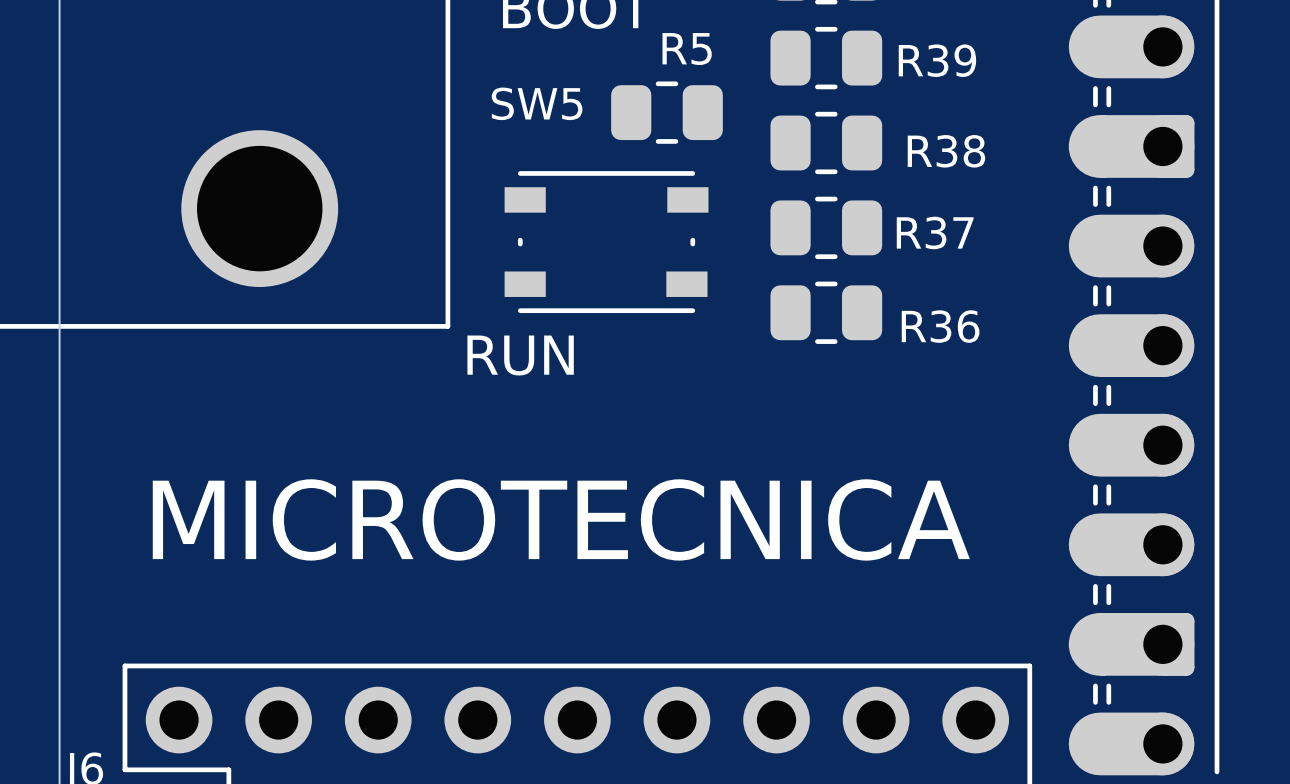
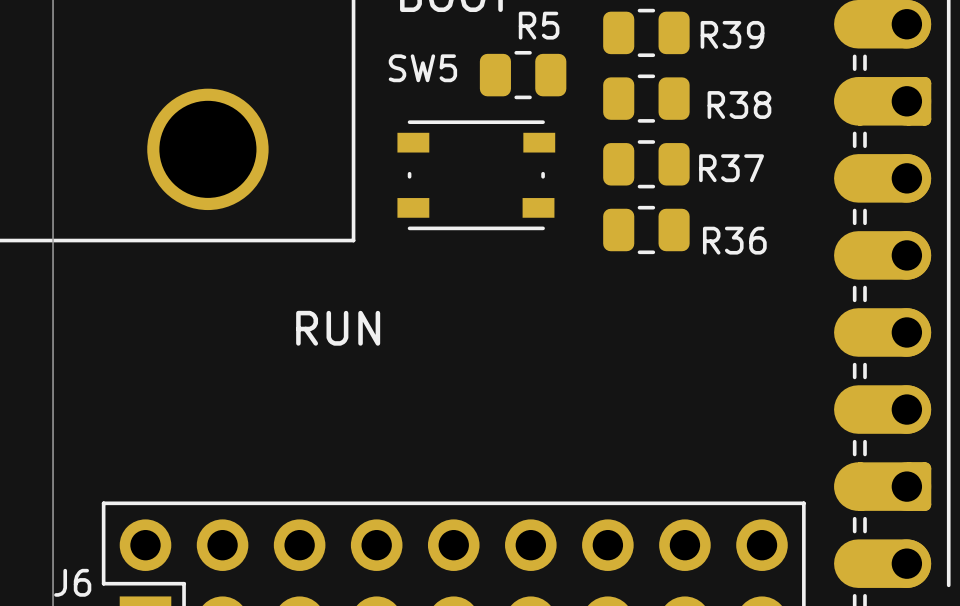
text position: RUN (520, 355) -> RUN (338, 328)
text: MICROTECNICA (561, 519) -> none

